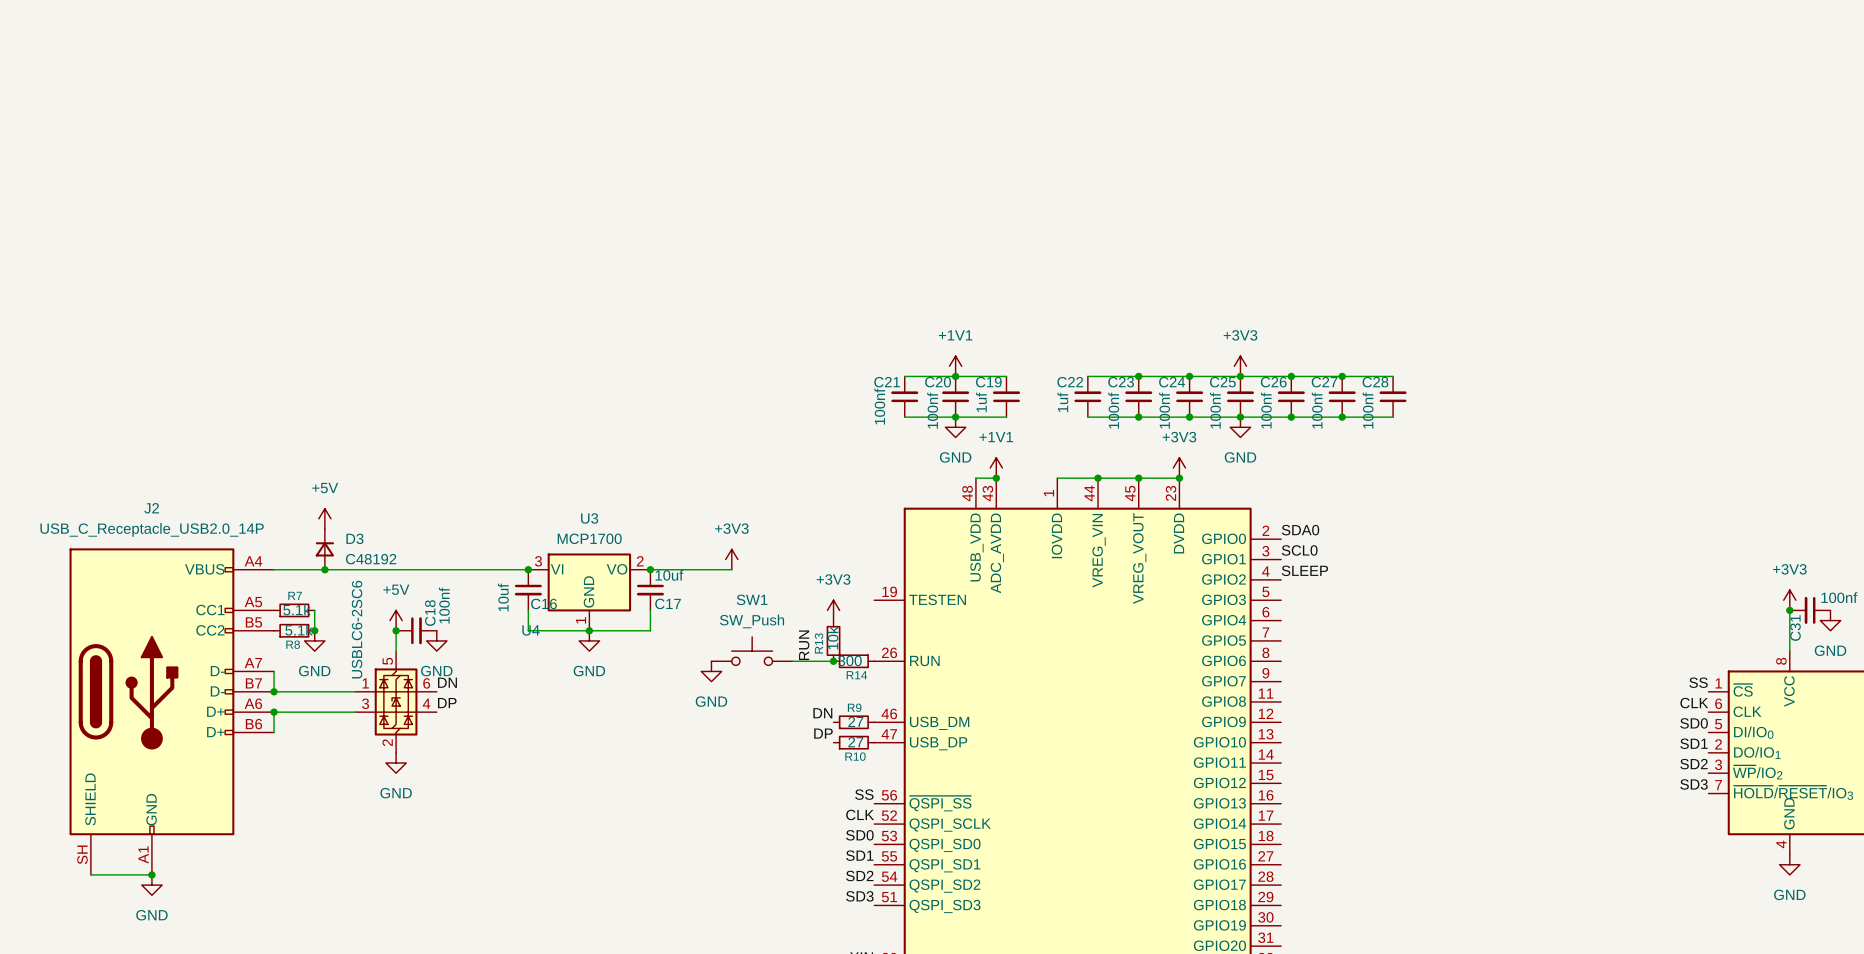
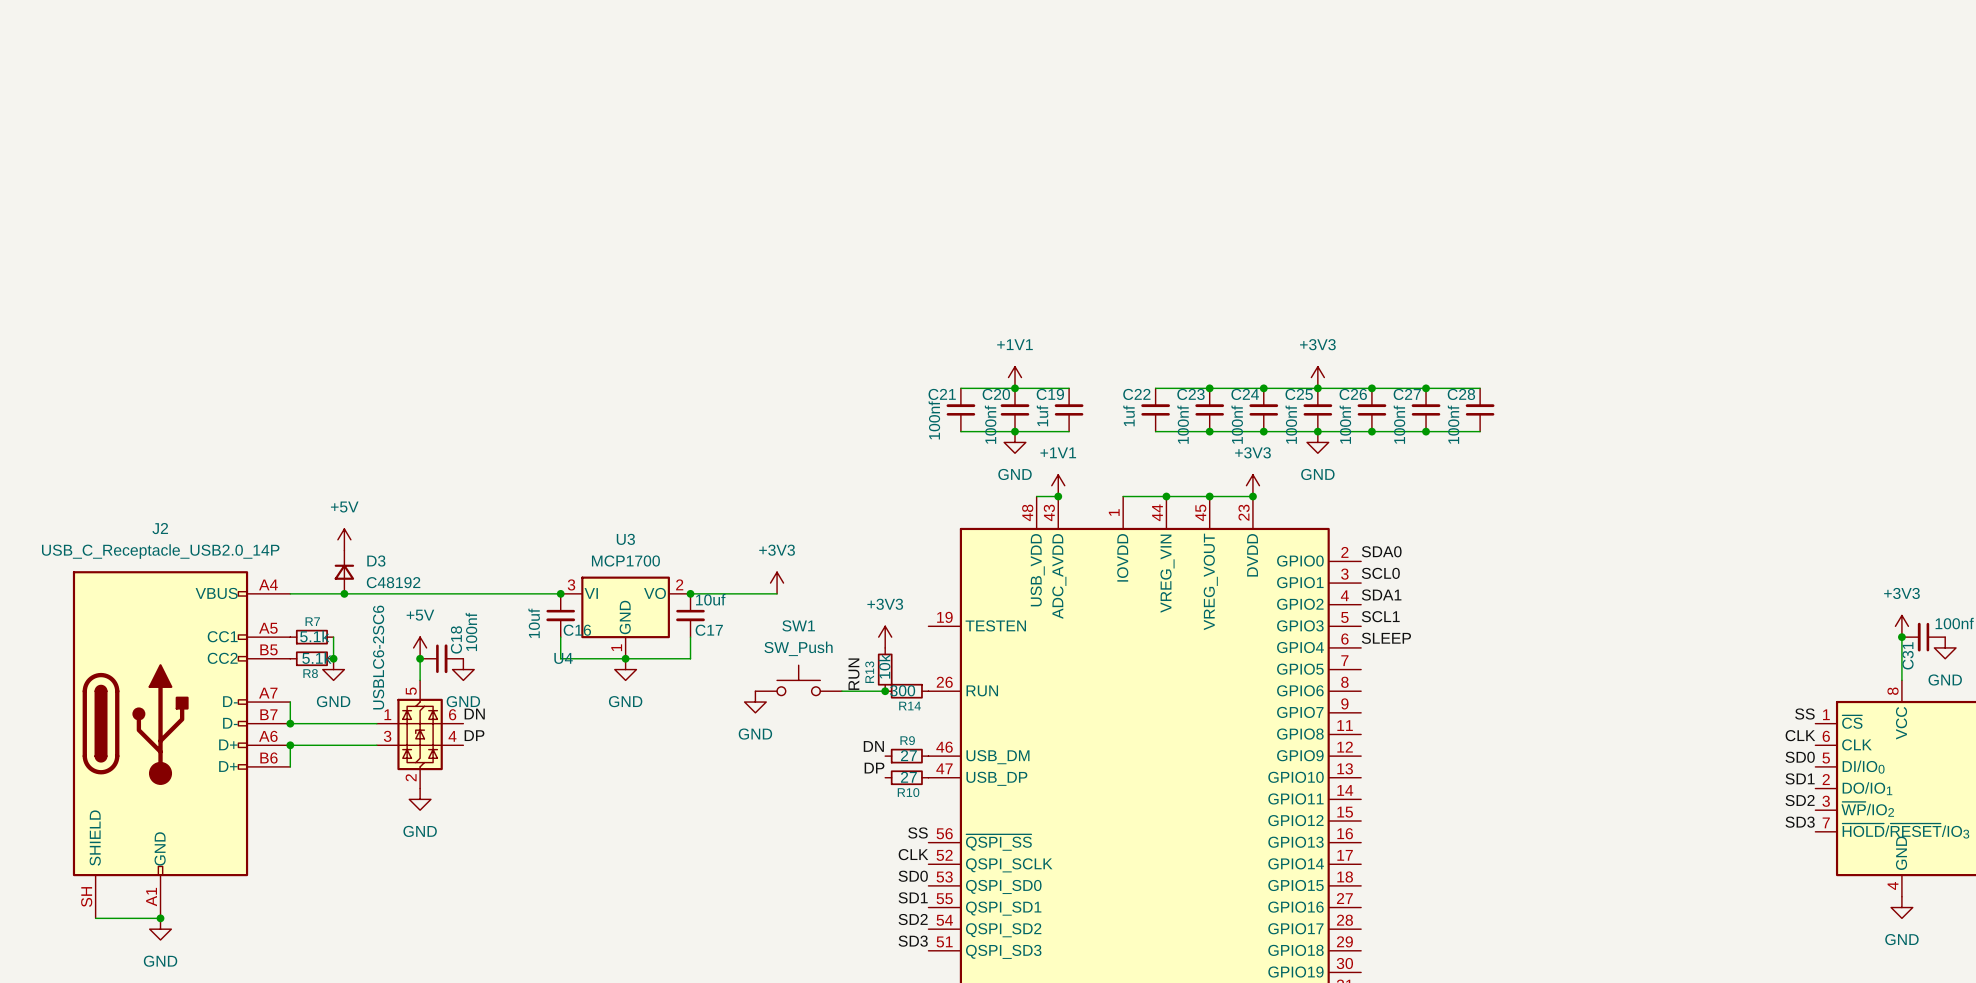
label: SLEEP (1304, 570) -> SDA1 (1381, 595)
label: none -> SCL1 (1380, 616)
label: none -> SLEEP (1386, 638)

